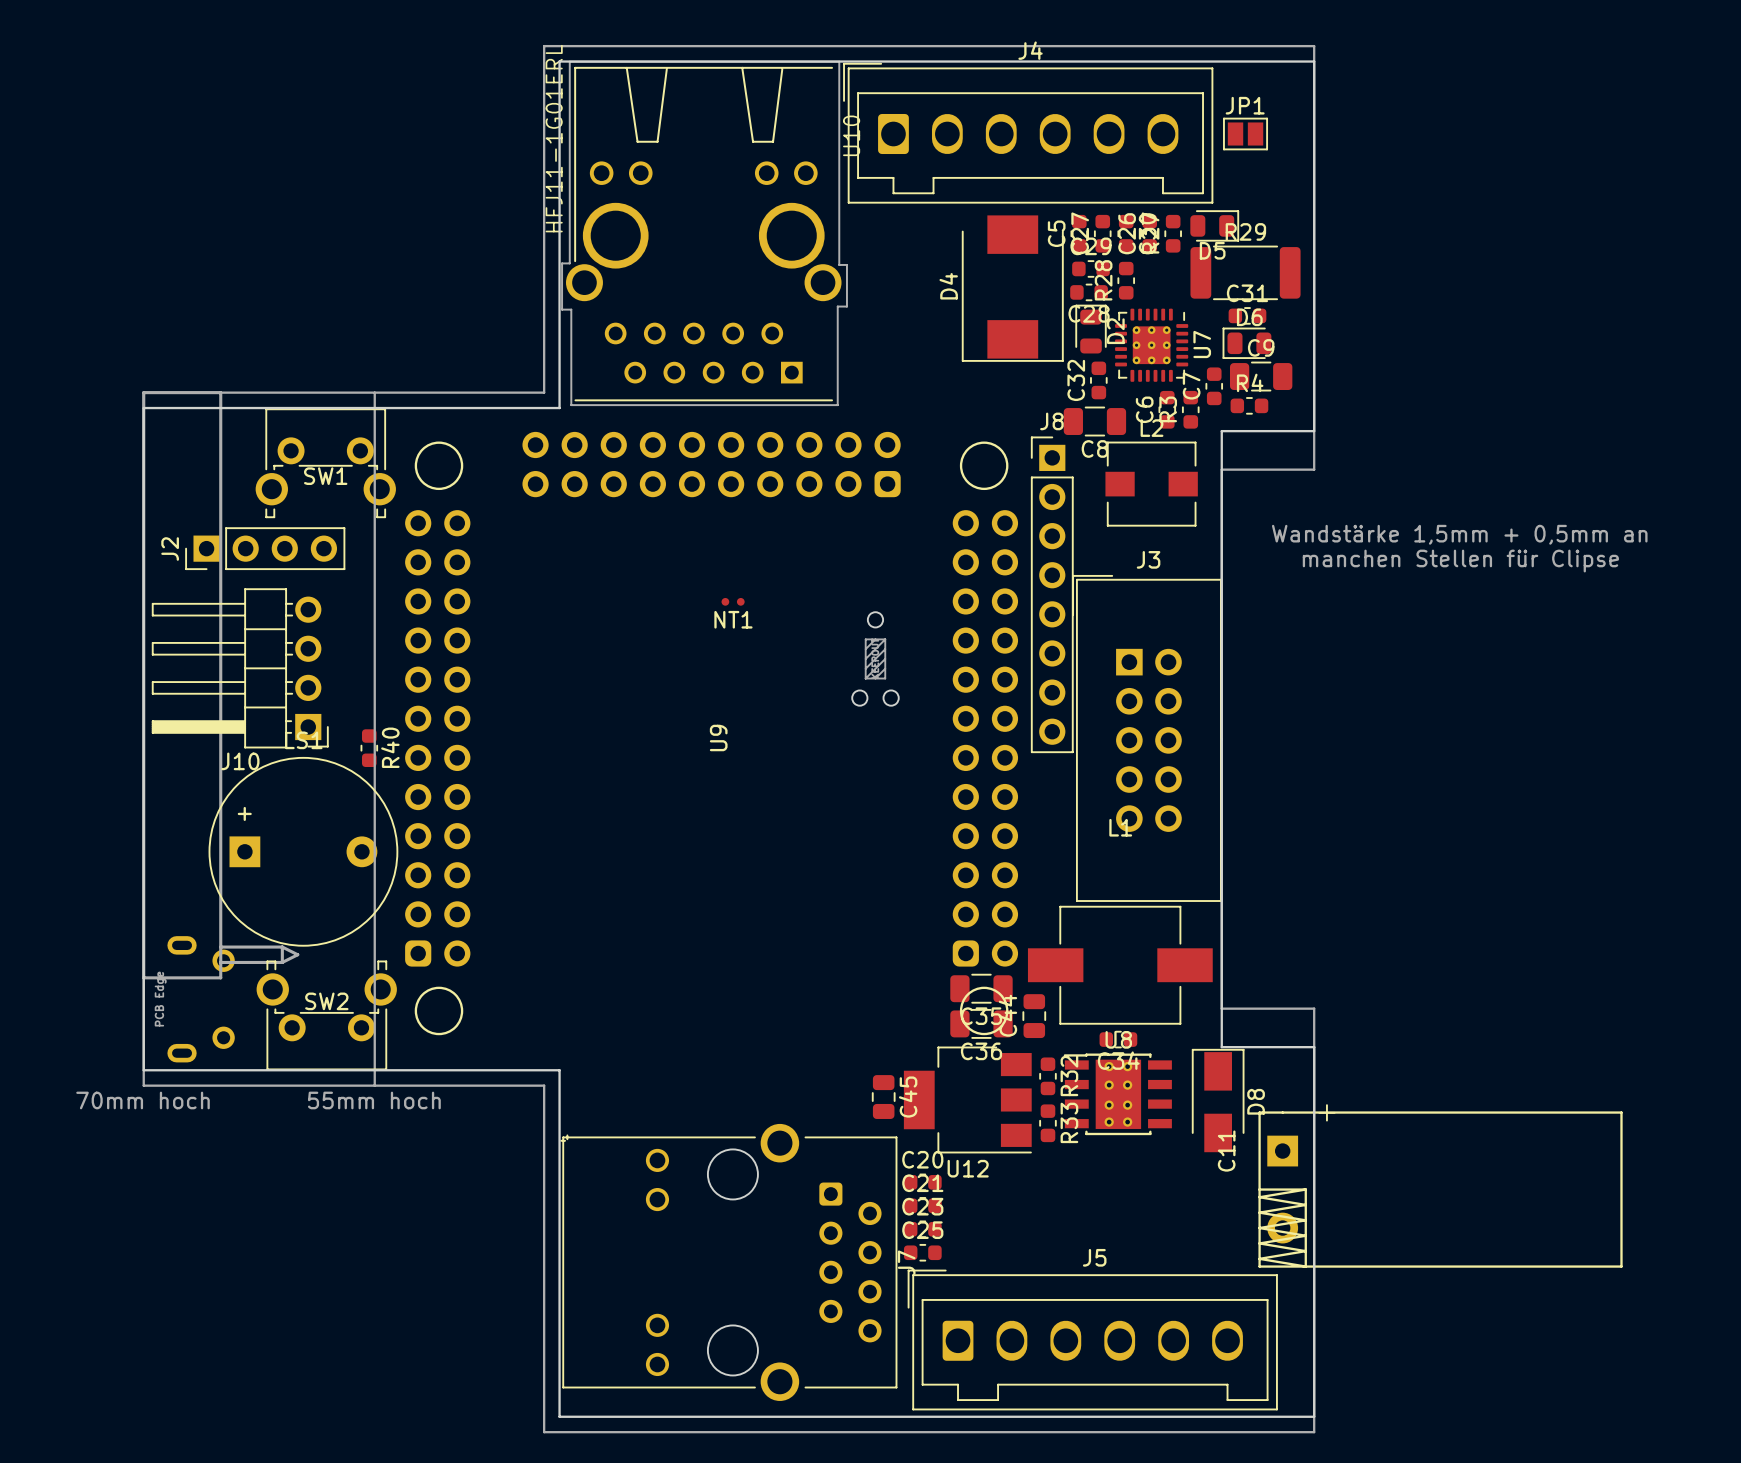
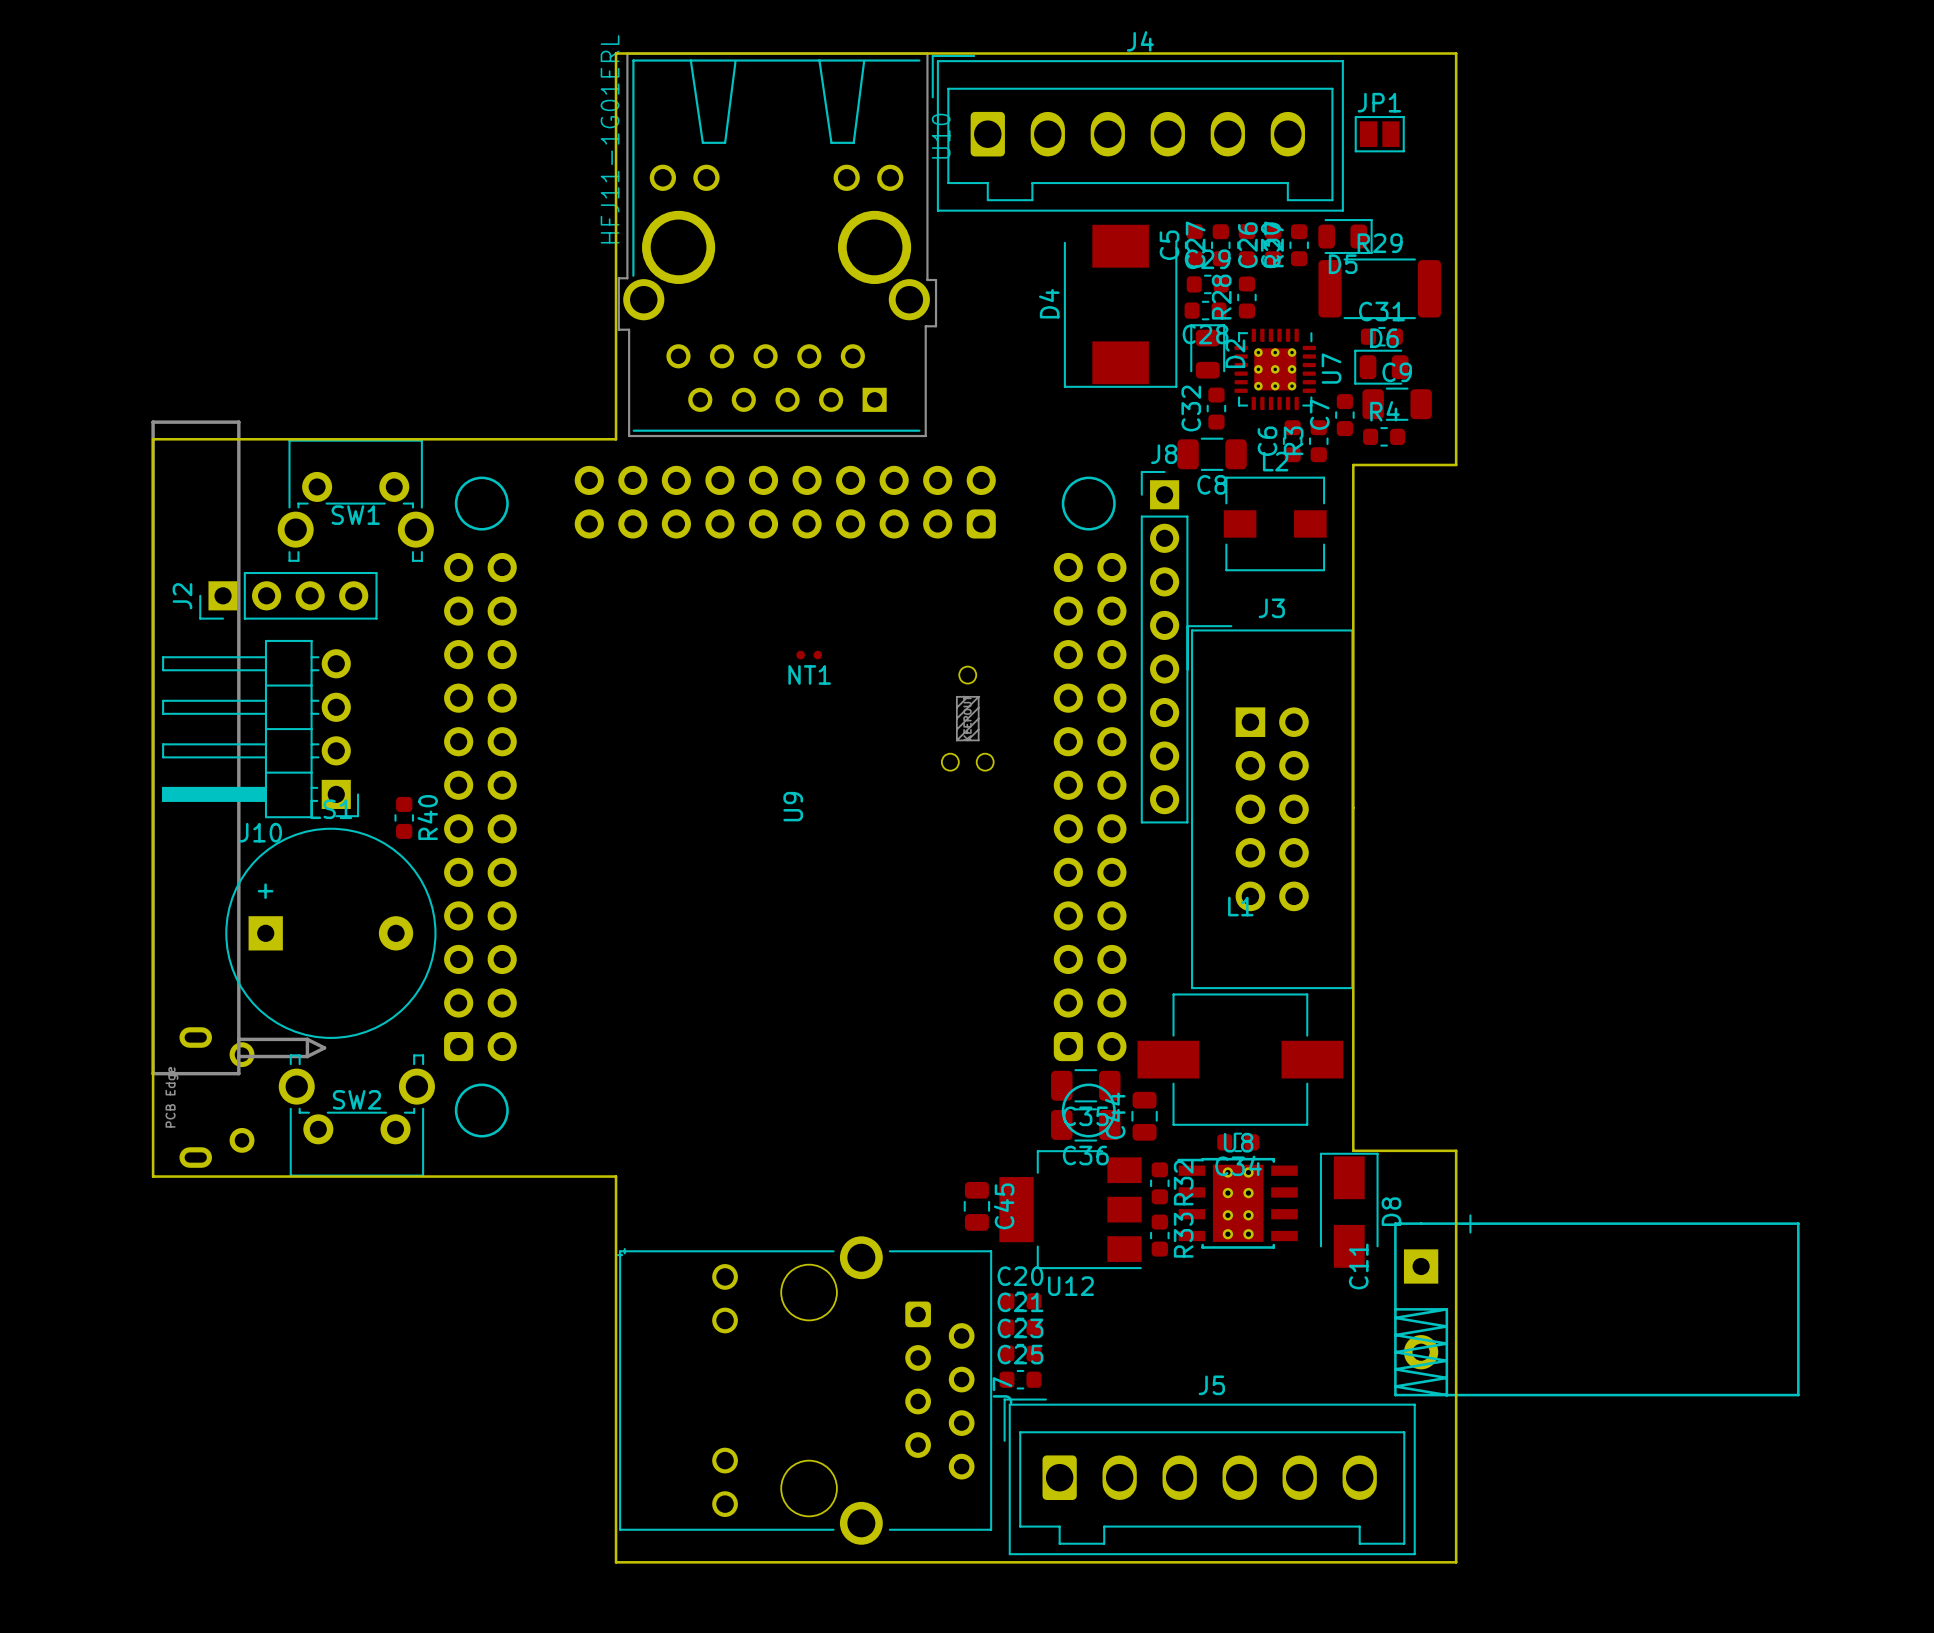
line: (544, 46) (544, 392) (143, 392) (143, 1085) (544, 1085) (544, 1432) (1314, 1432) (1314, 1008) (1221, 1008) (1221, 469) (1314, 469) (1314, 46) (544, 46) -> none
line: (374, 392) (374, 1085) -> none
text: Wandstärke 1,5mm + 0,5mm an (1459, 534) -> none
text: manchen Stellen für Clipse (1460, 561) -> none
text: 70mm hoch (143, 1100) -> none
text: 55mm hoch (374, 1100) -> none

